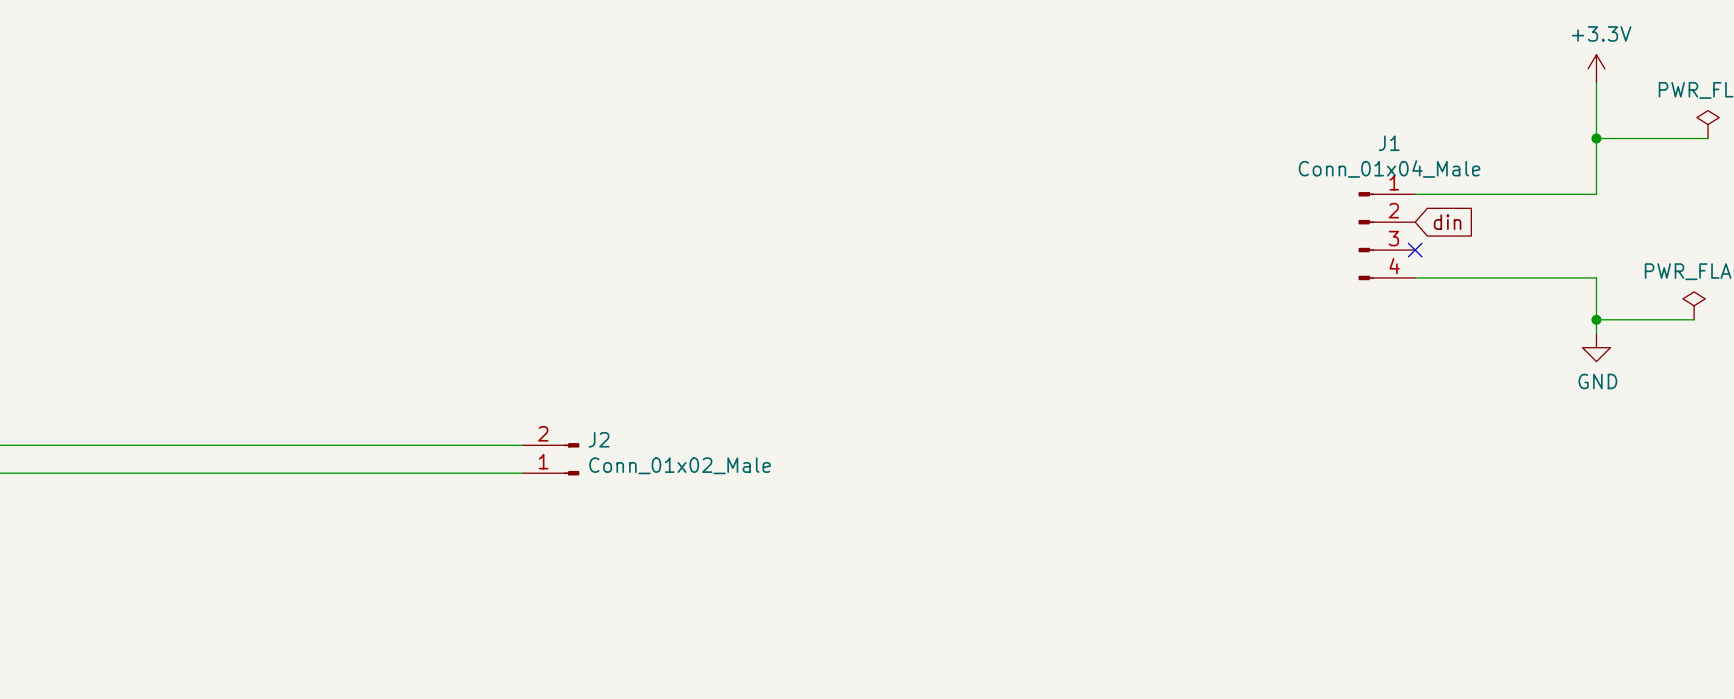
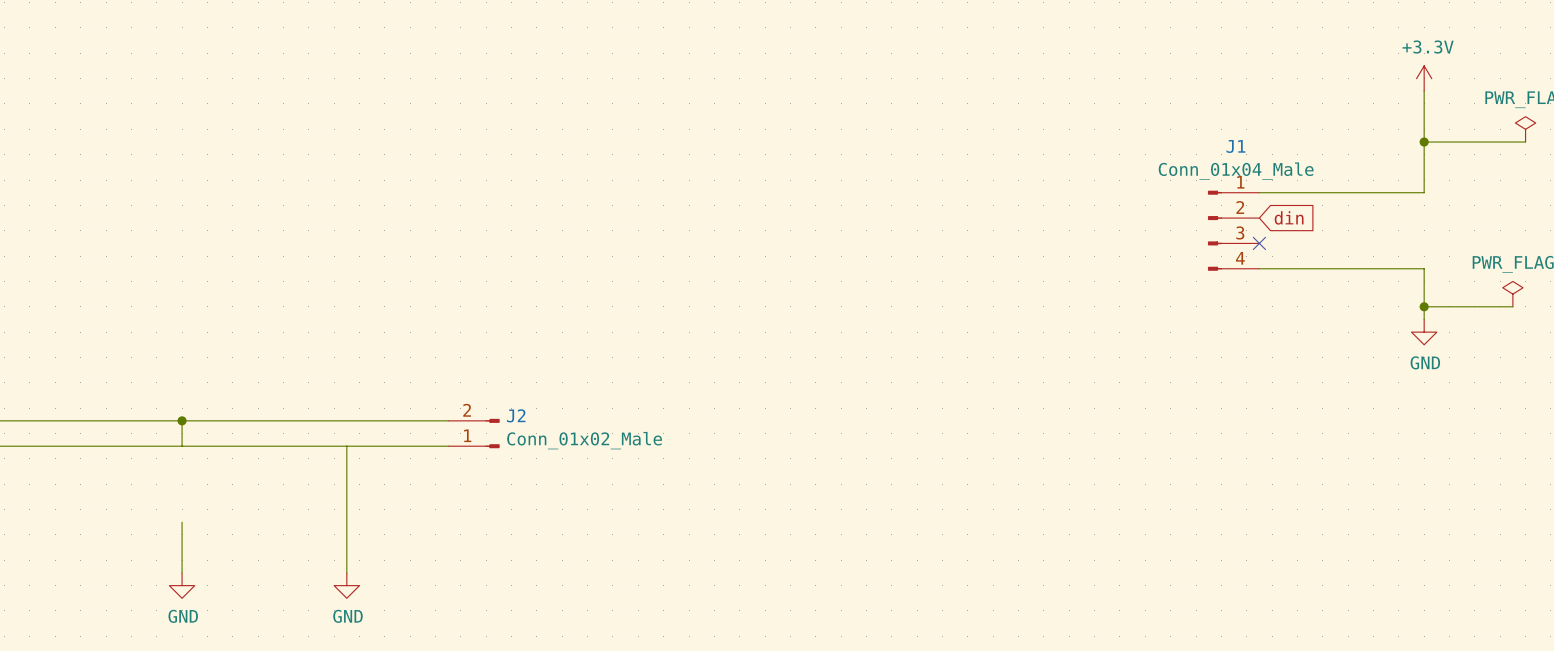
wire: none -> (182, 420) (182, 446)
junction: none -> (182, 420)
wire: none -> (346, 446) (346, 572)
wire: none -> (182, 522) (182, 572)
power symbol: none -> GND (182, 585)
power symbol: none -> GND (346, 585)

